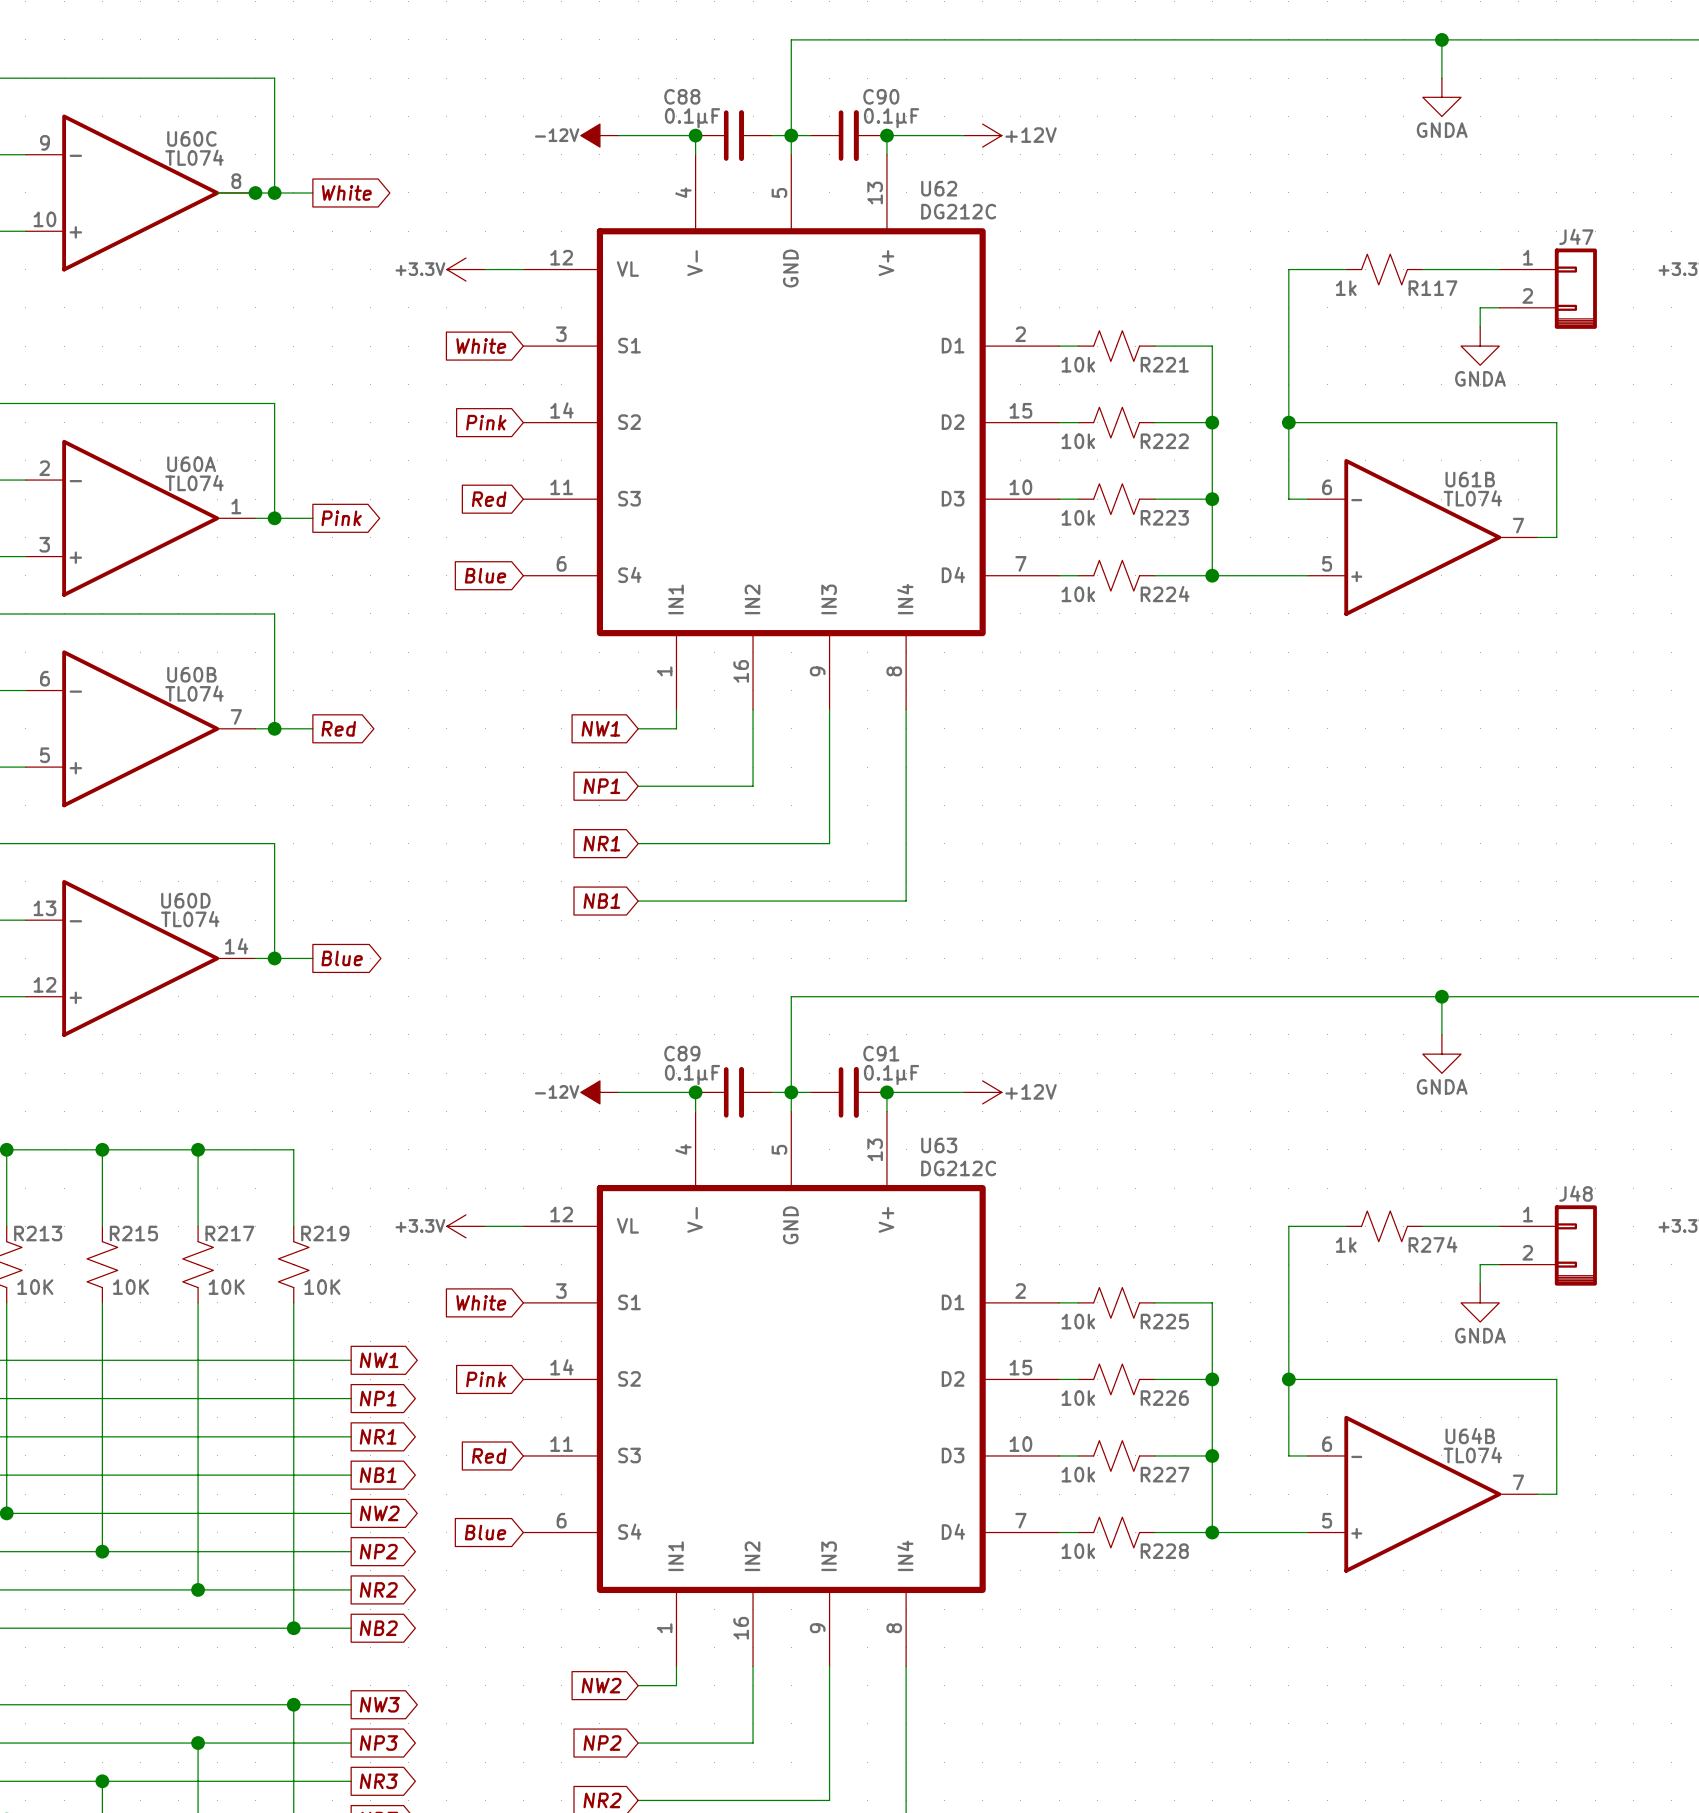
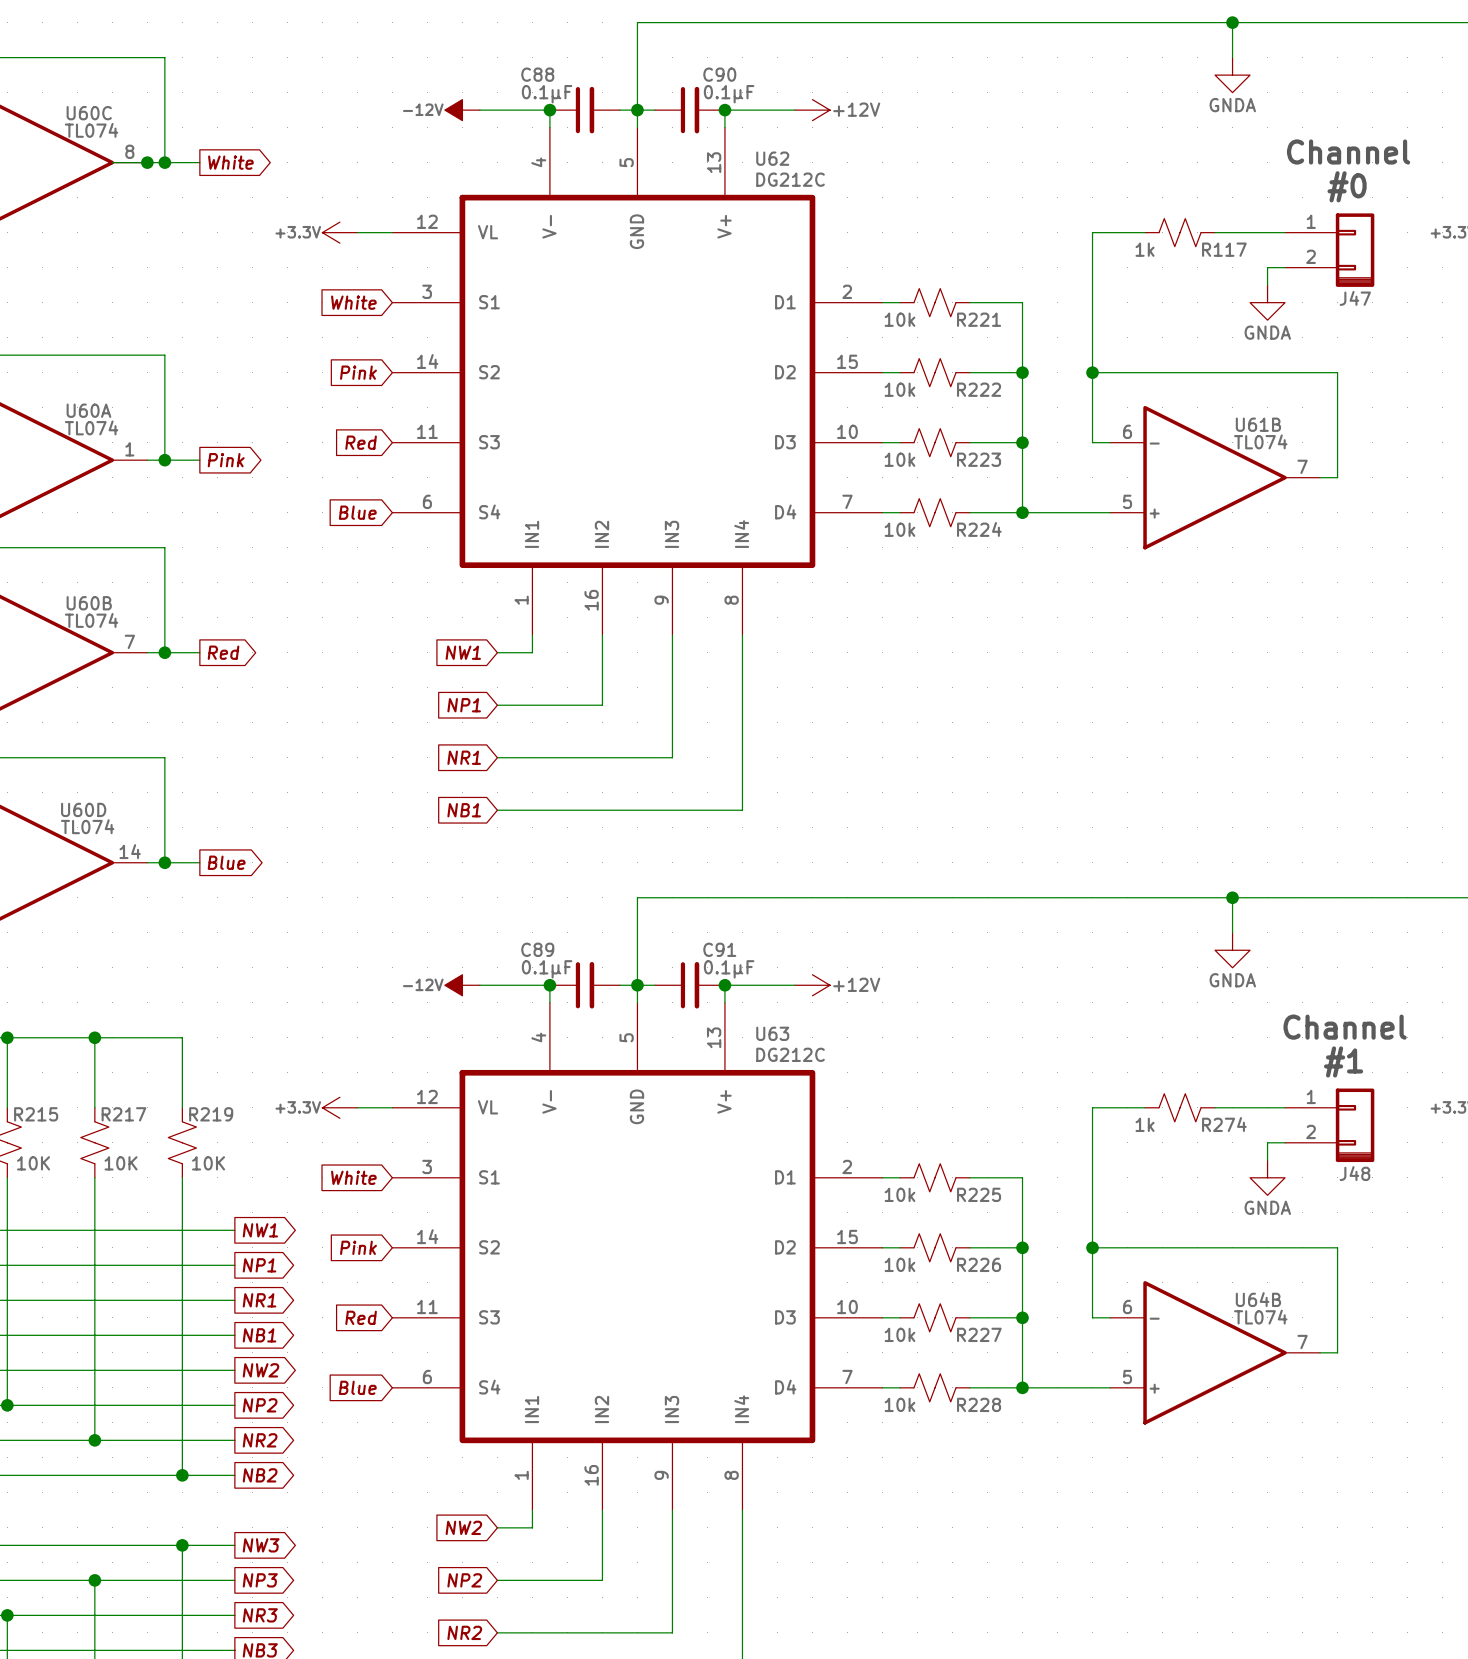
text: none -> Channel (1348, 151)
text: none -> #0 (1347, 186)
J47 name position: J47 (1576, 236) -> J47 (1355, 298)
text: none -> Channel (1345, 1027)
text: none -> #1 (1343, 1061)
J48 name position: J48 (1576, 1193) -> J48 (1354, 1173)

